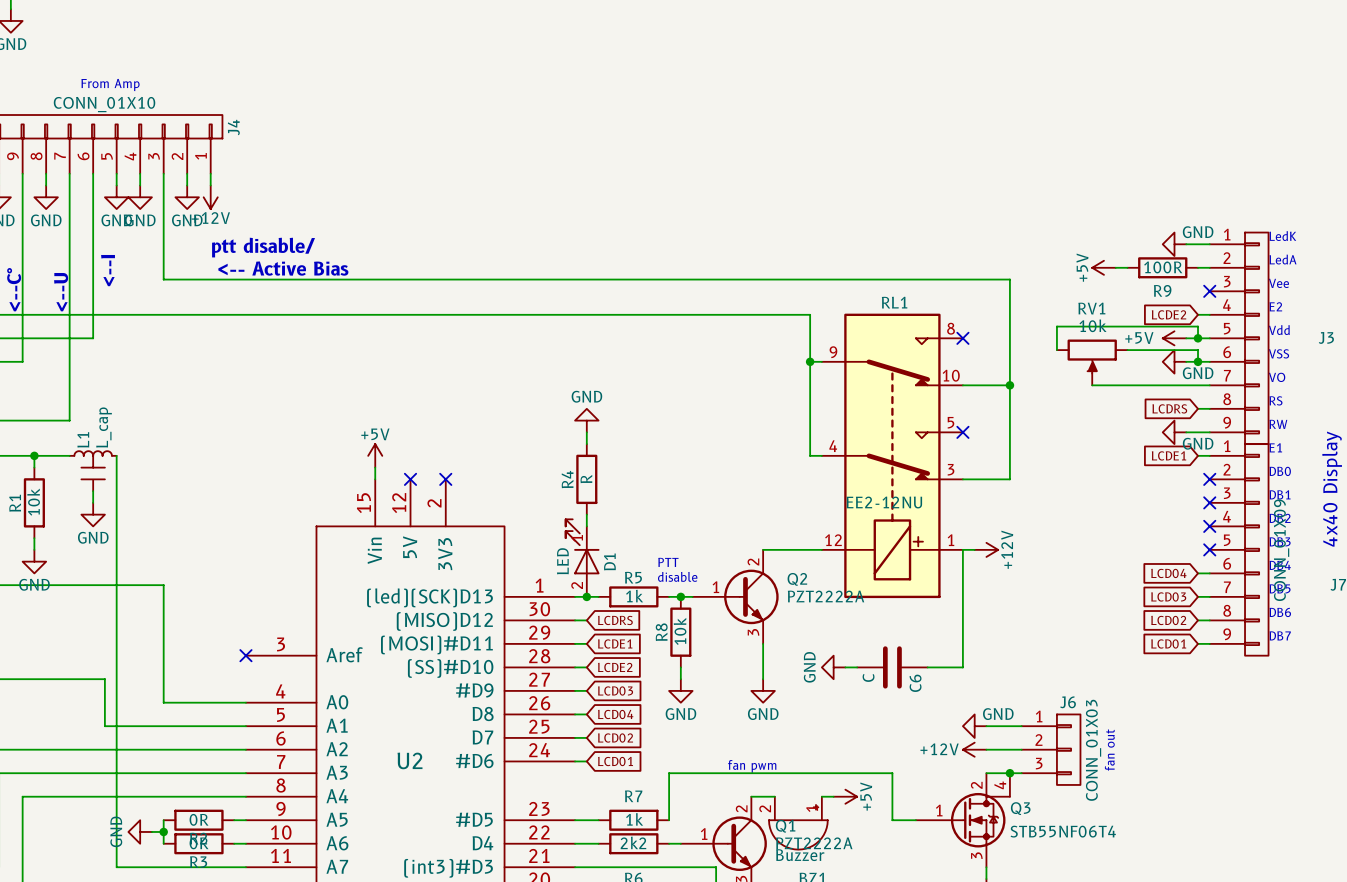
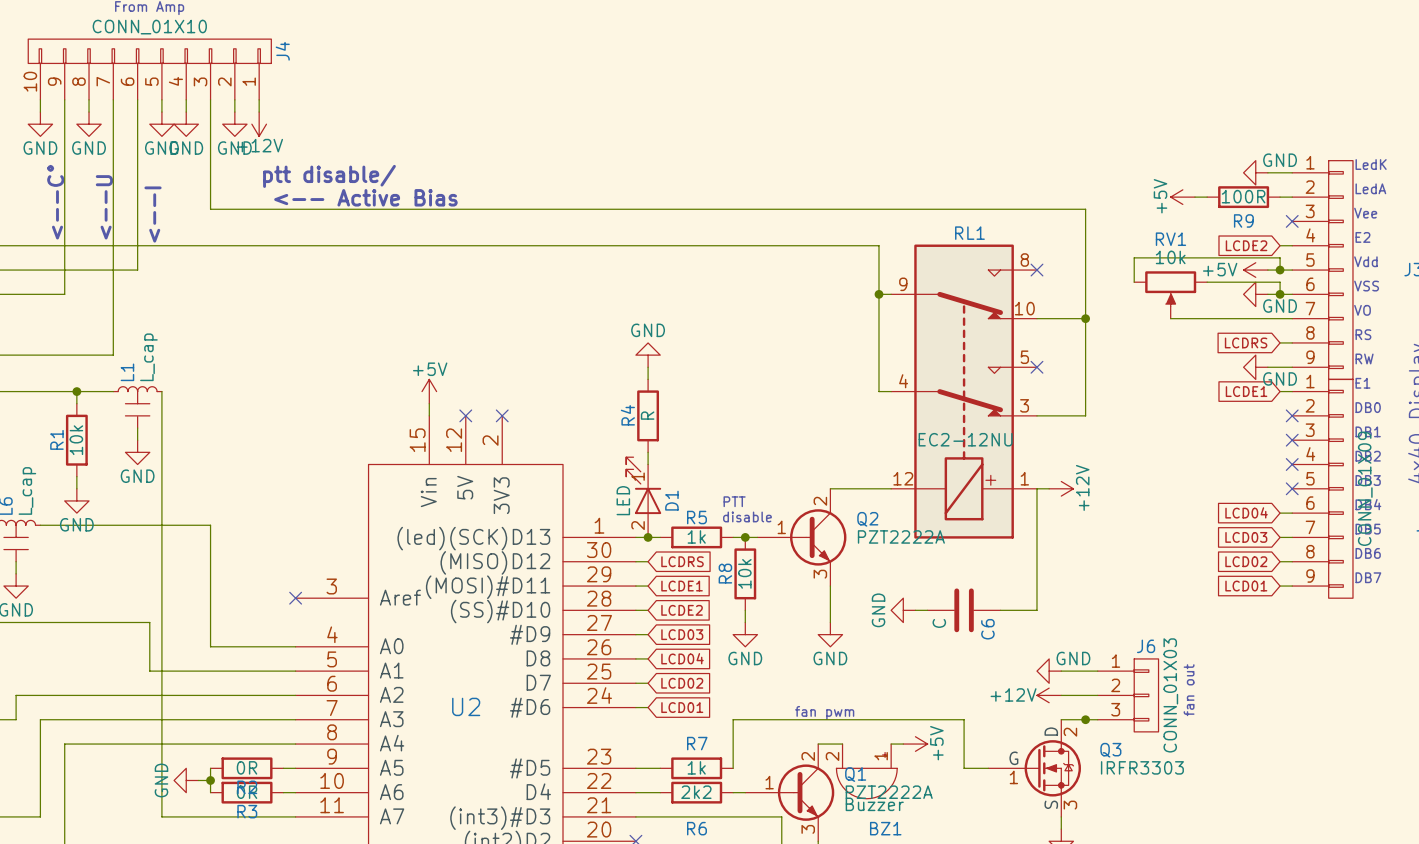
RL1 value: EE2-12NU (884, 502) -> EC2-12NU (965, 439)
Q3 symbol: [915, 773, 1010, 868] -> [988, 719, 1081, 817]
Q3 value: STB55NF06T4 (1063, 831) -> IRFR3303 (1142, 767)

